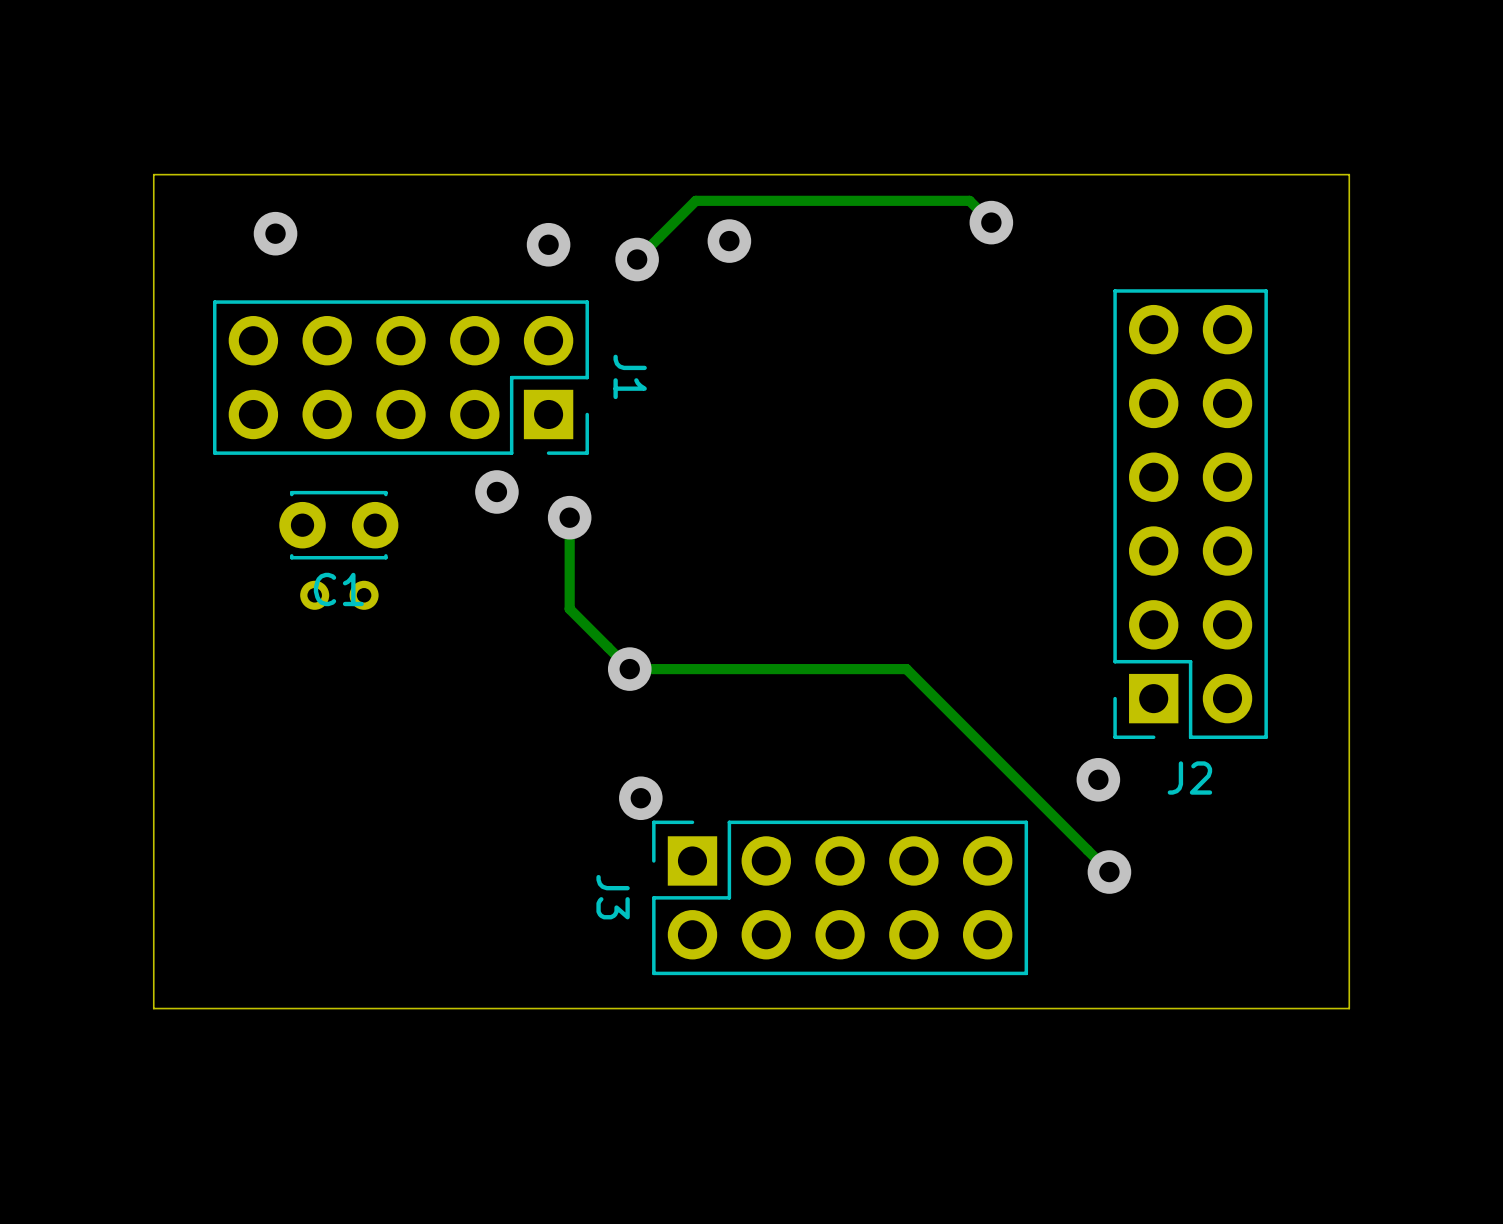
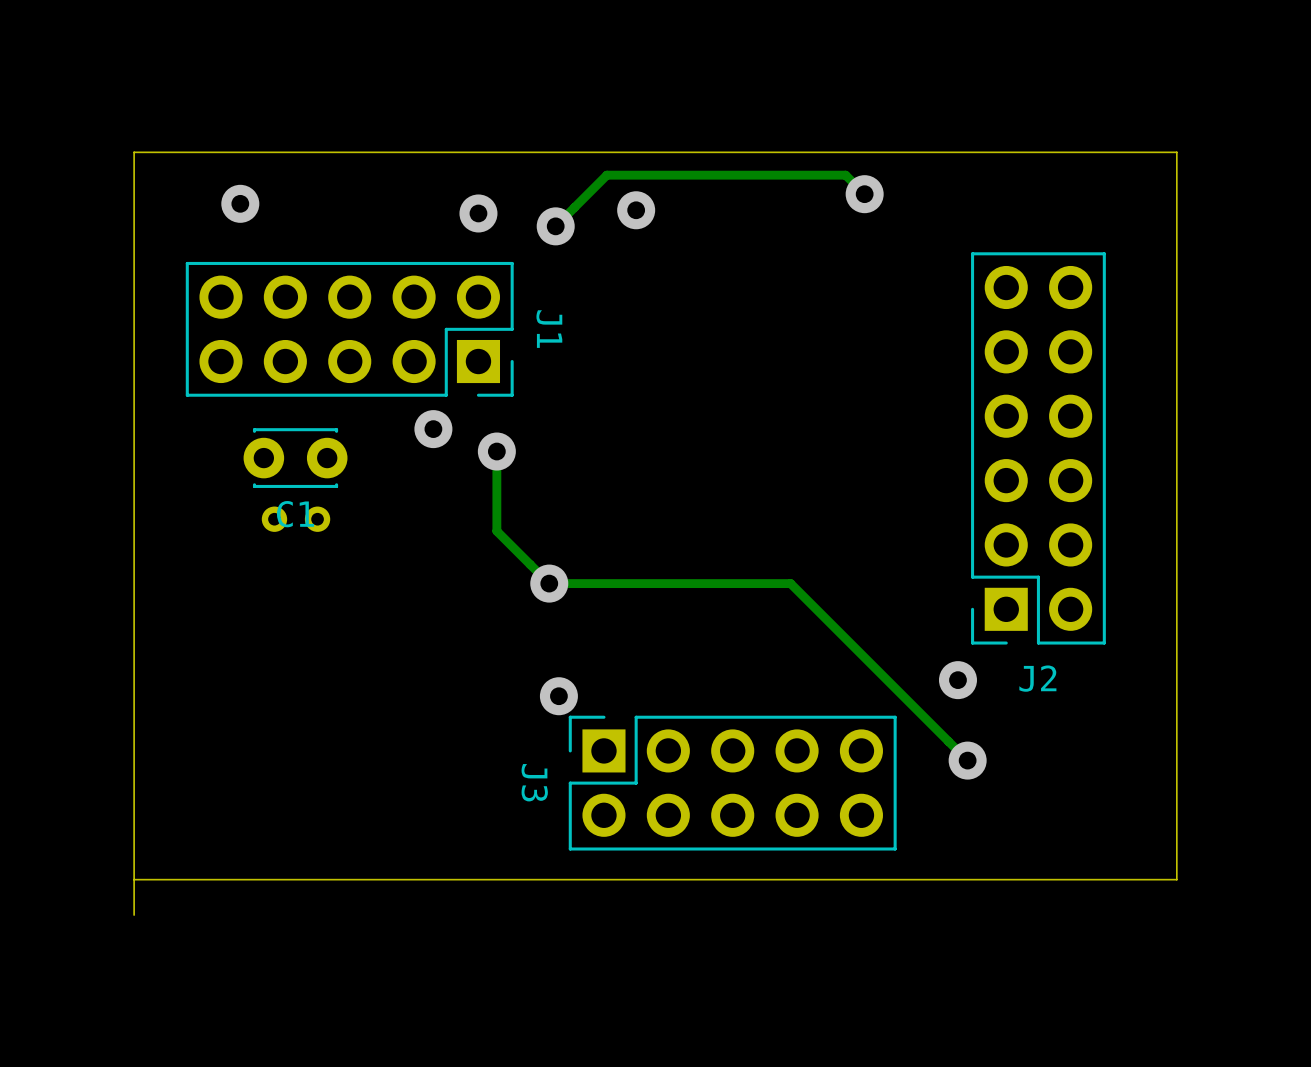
board edge: none -> (134, 879) (134, 915)

